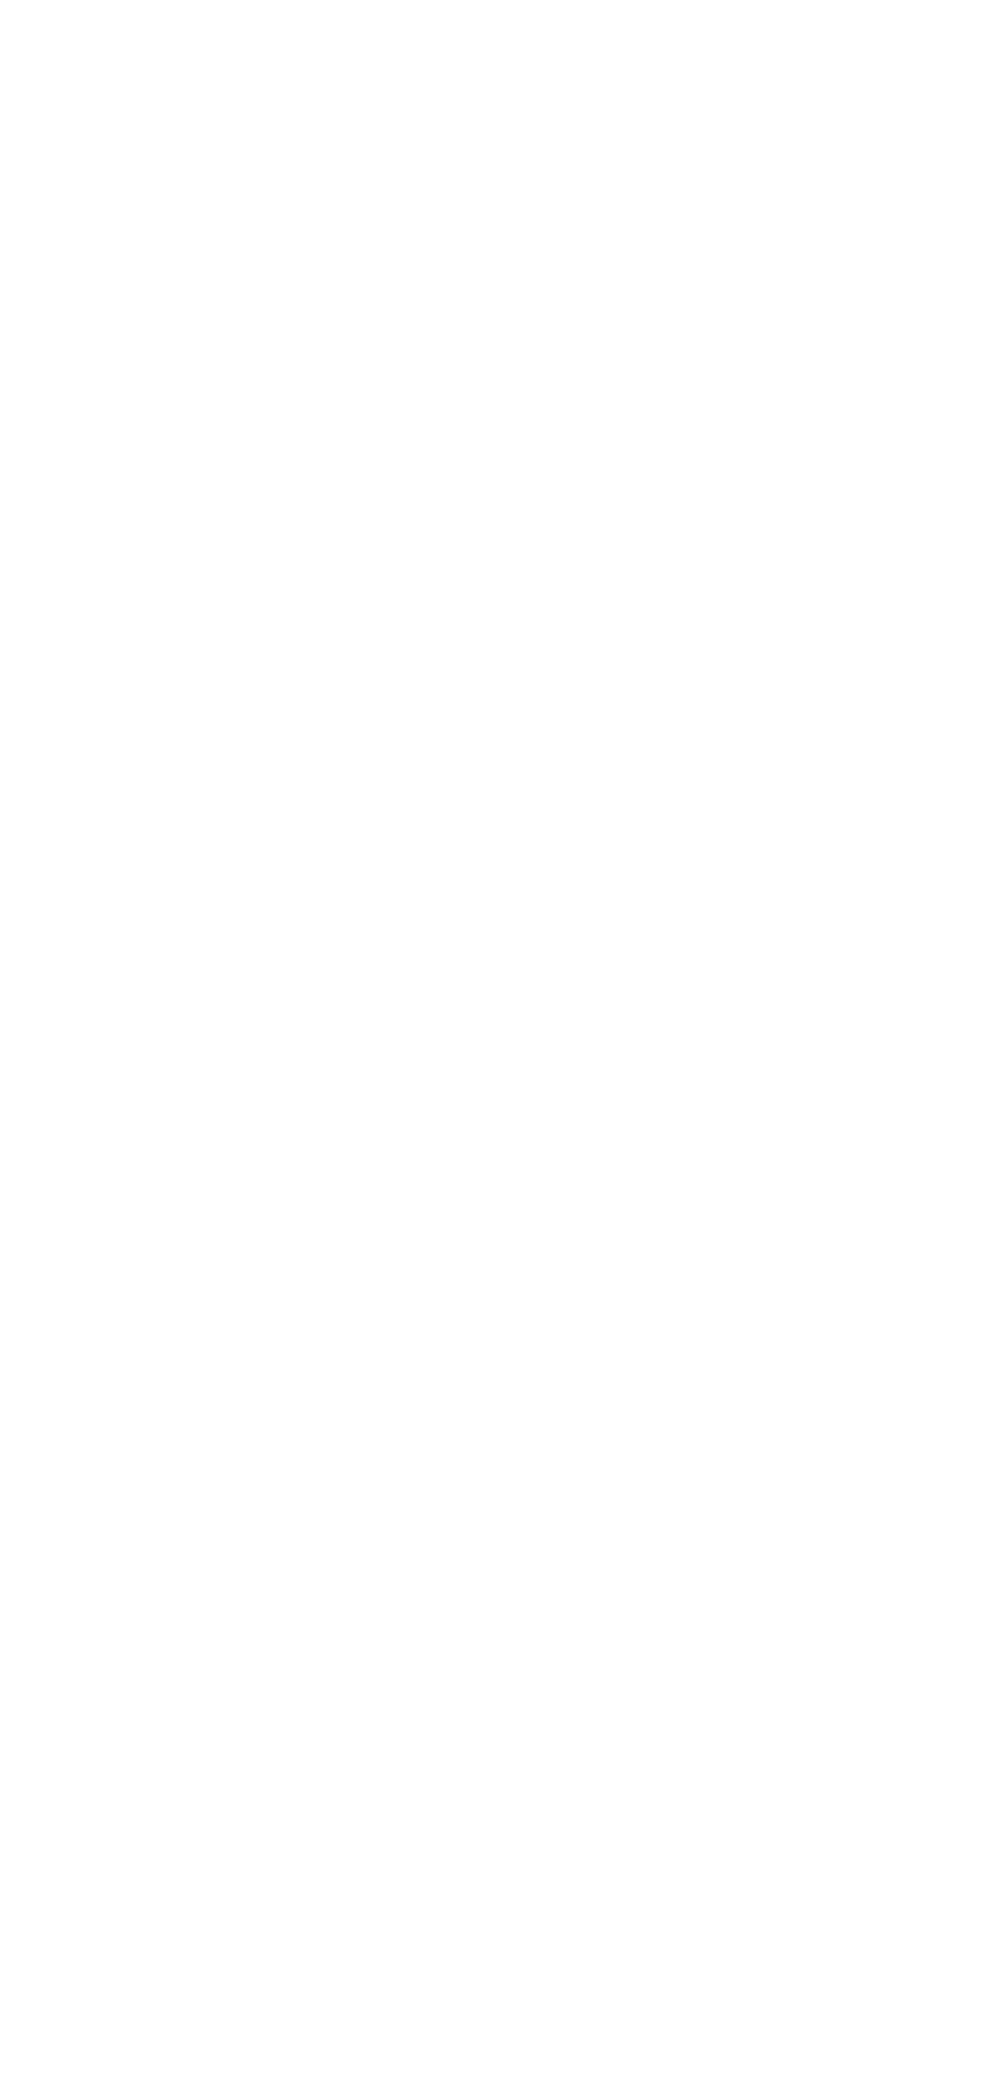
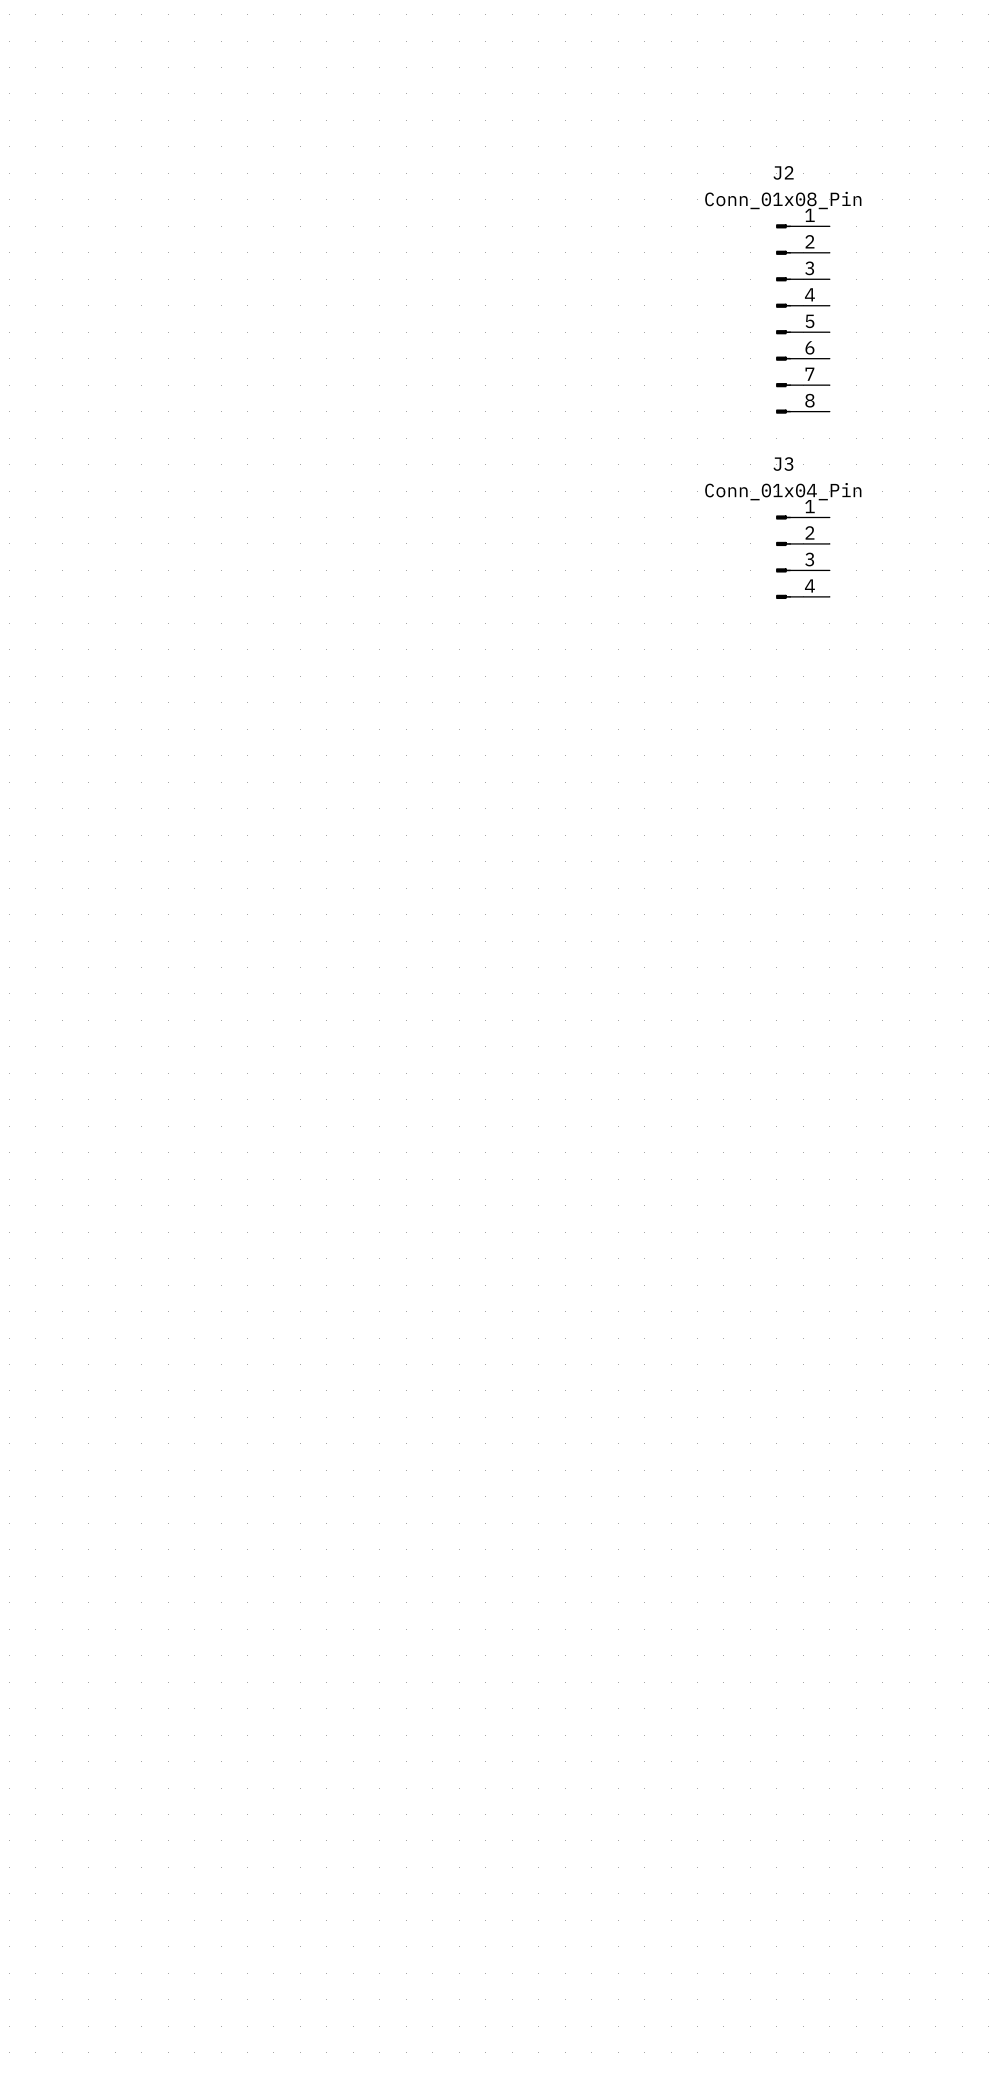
J2: none -> Conn_01x08_Pin (802, 318)
J3: none -> Conn_01x04_Pin (802, 557)

